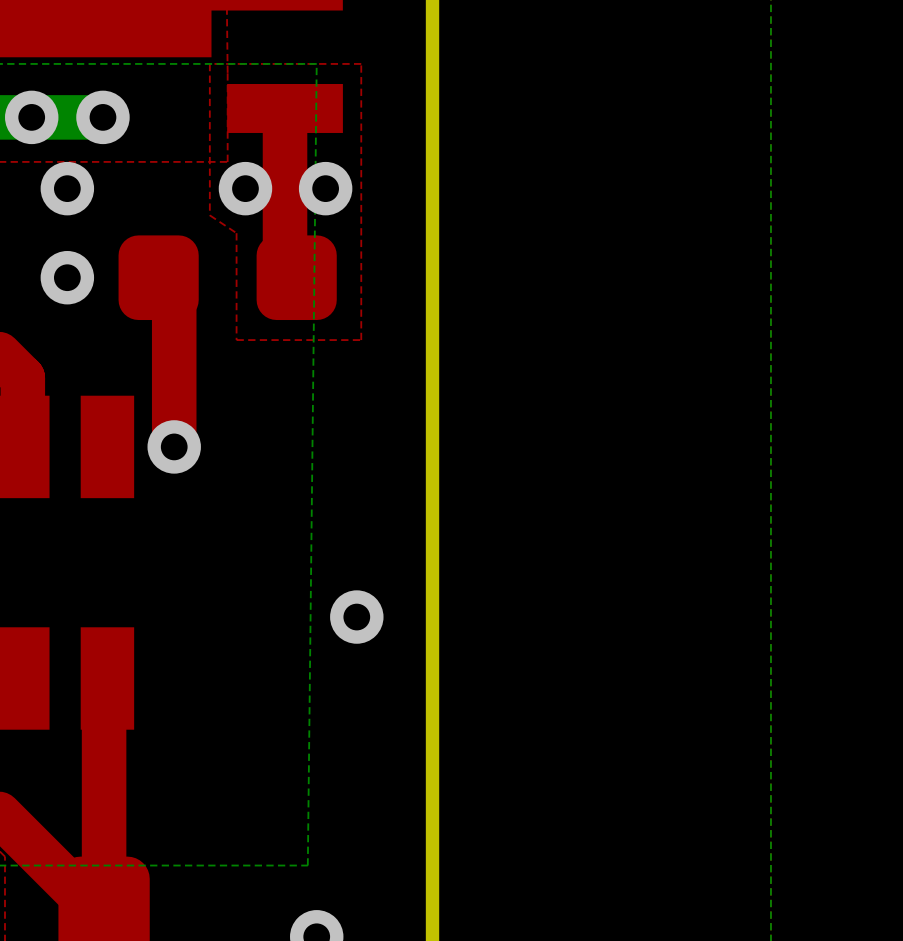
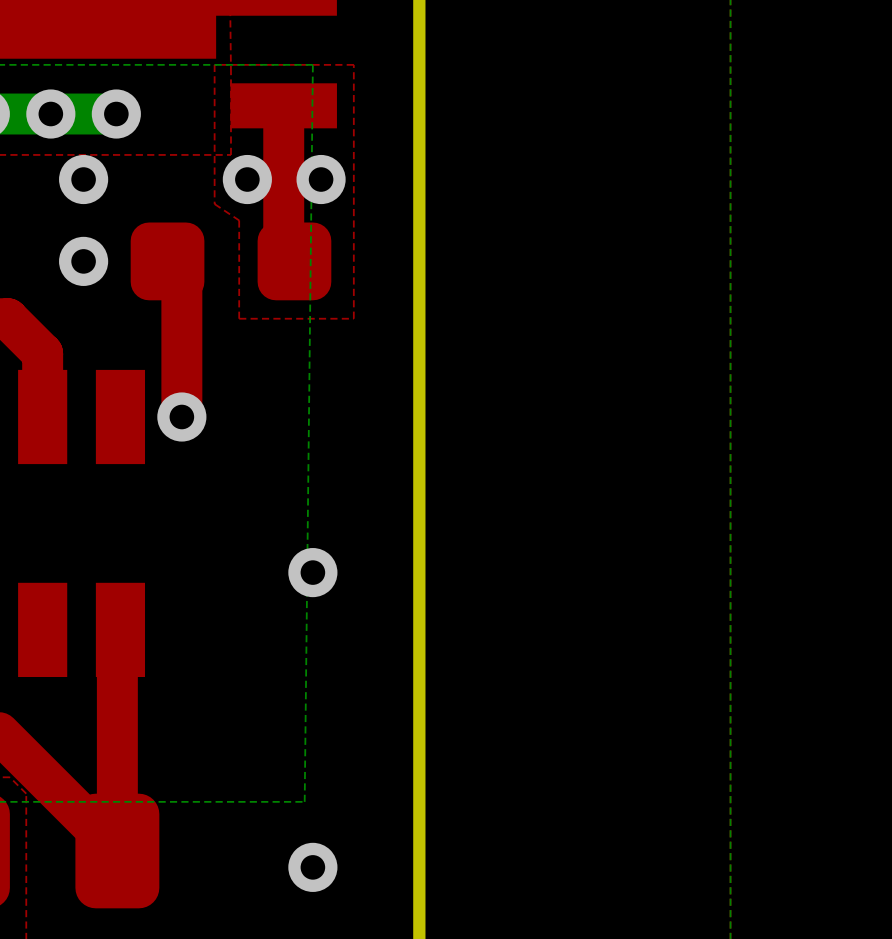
via position: (356, 617) -> (312, 572)

